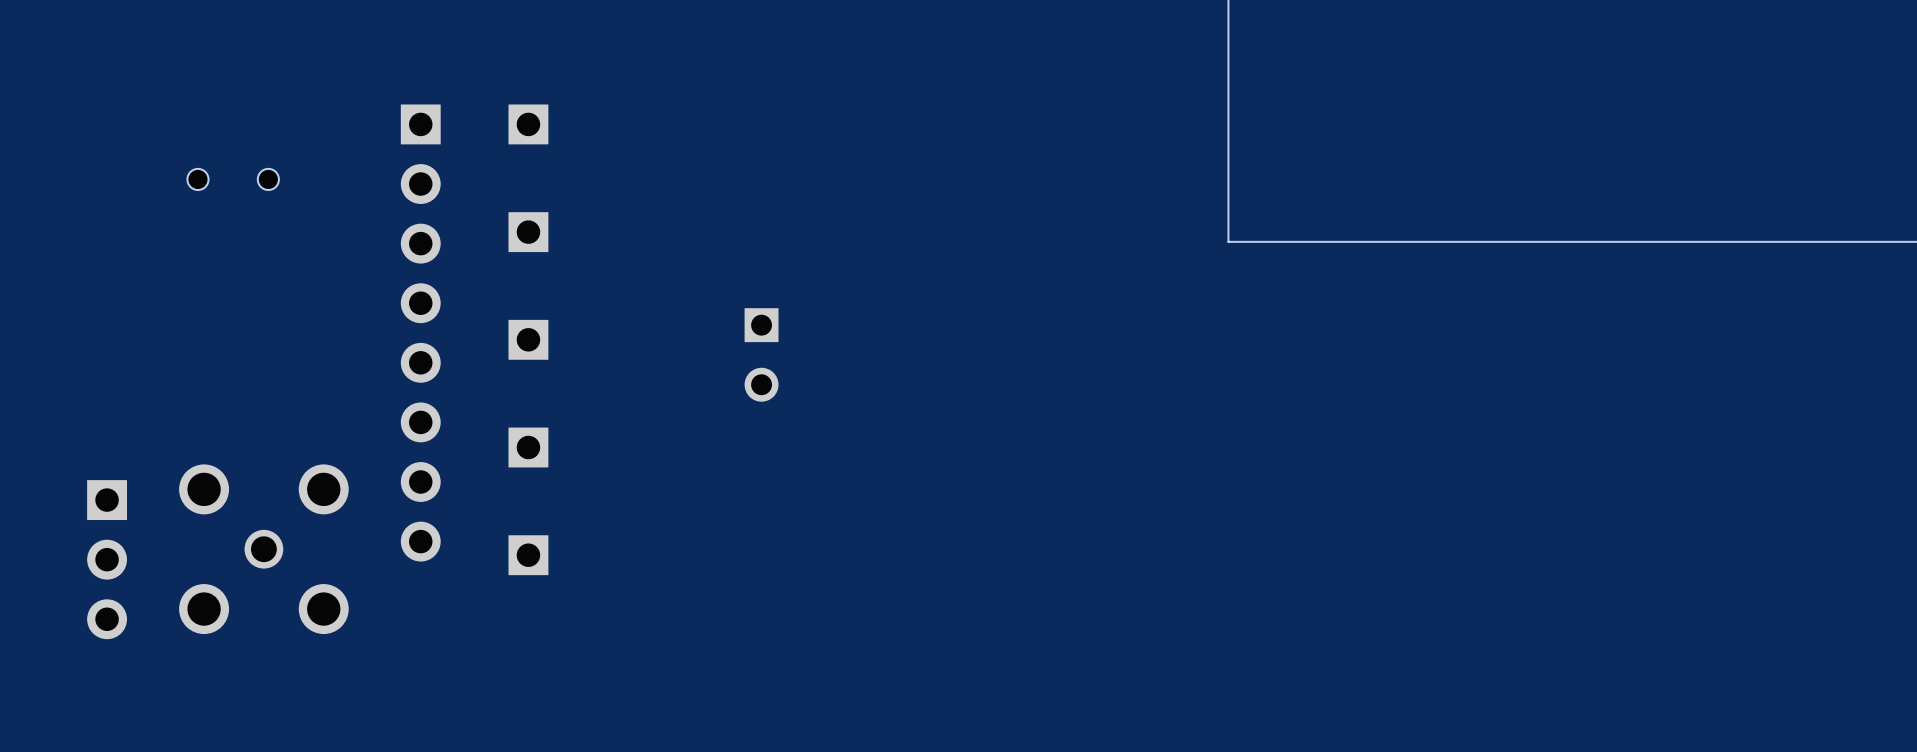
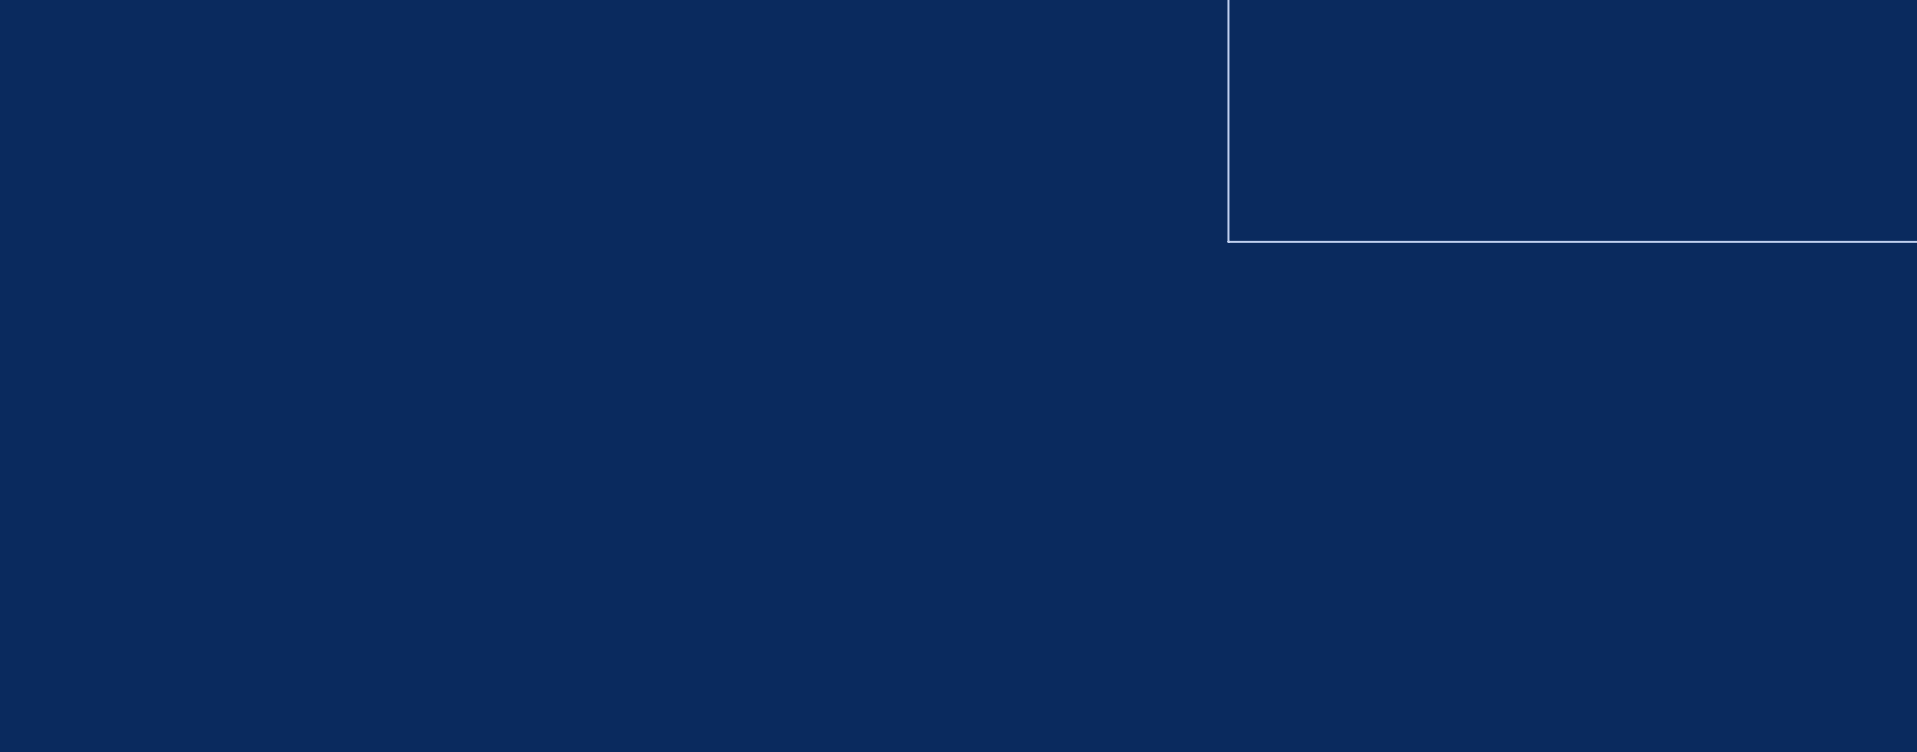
part: (528, 124) -> none
part: (233, 179) -> none
part: (528, 232) -> none
part: (420, 333) -> none
part: (528, 339) -> none
part: (761, 354) -> none
part: (528, 447) -> none
part: (263, 549) -> none
part: (528, 555) -> none
part: (107, 559) -> none

